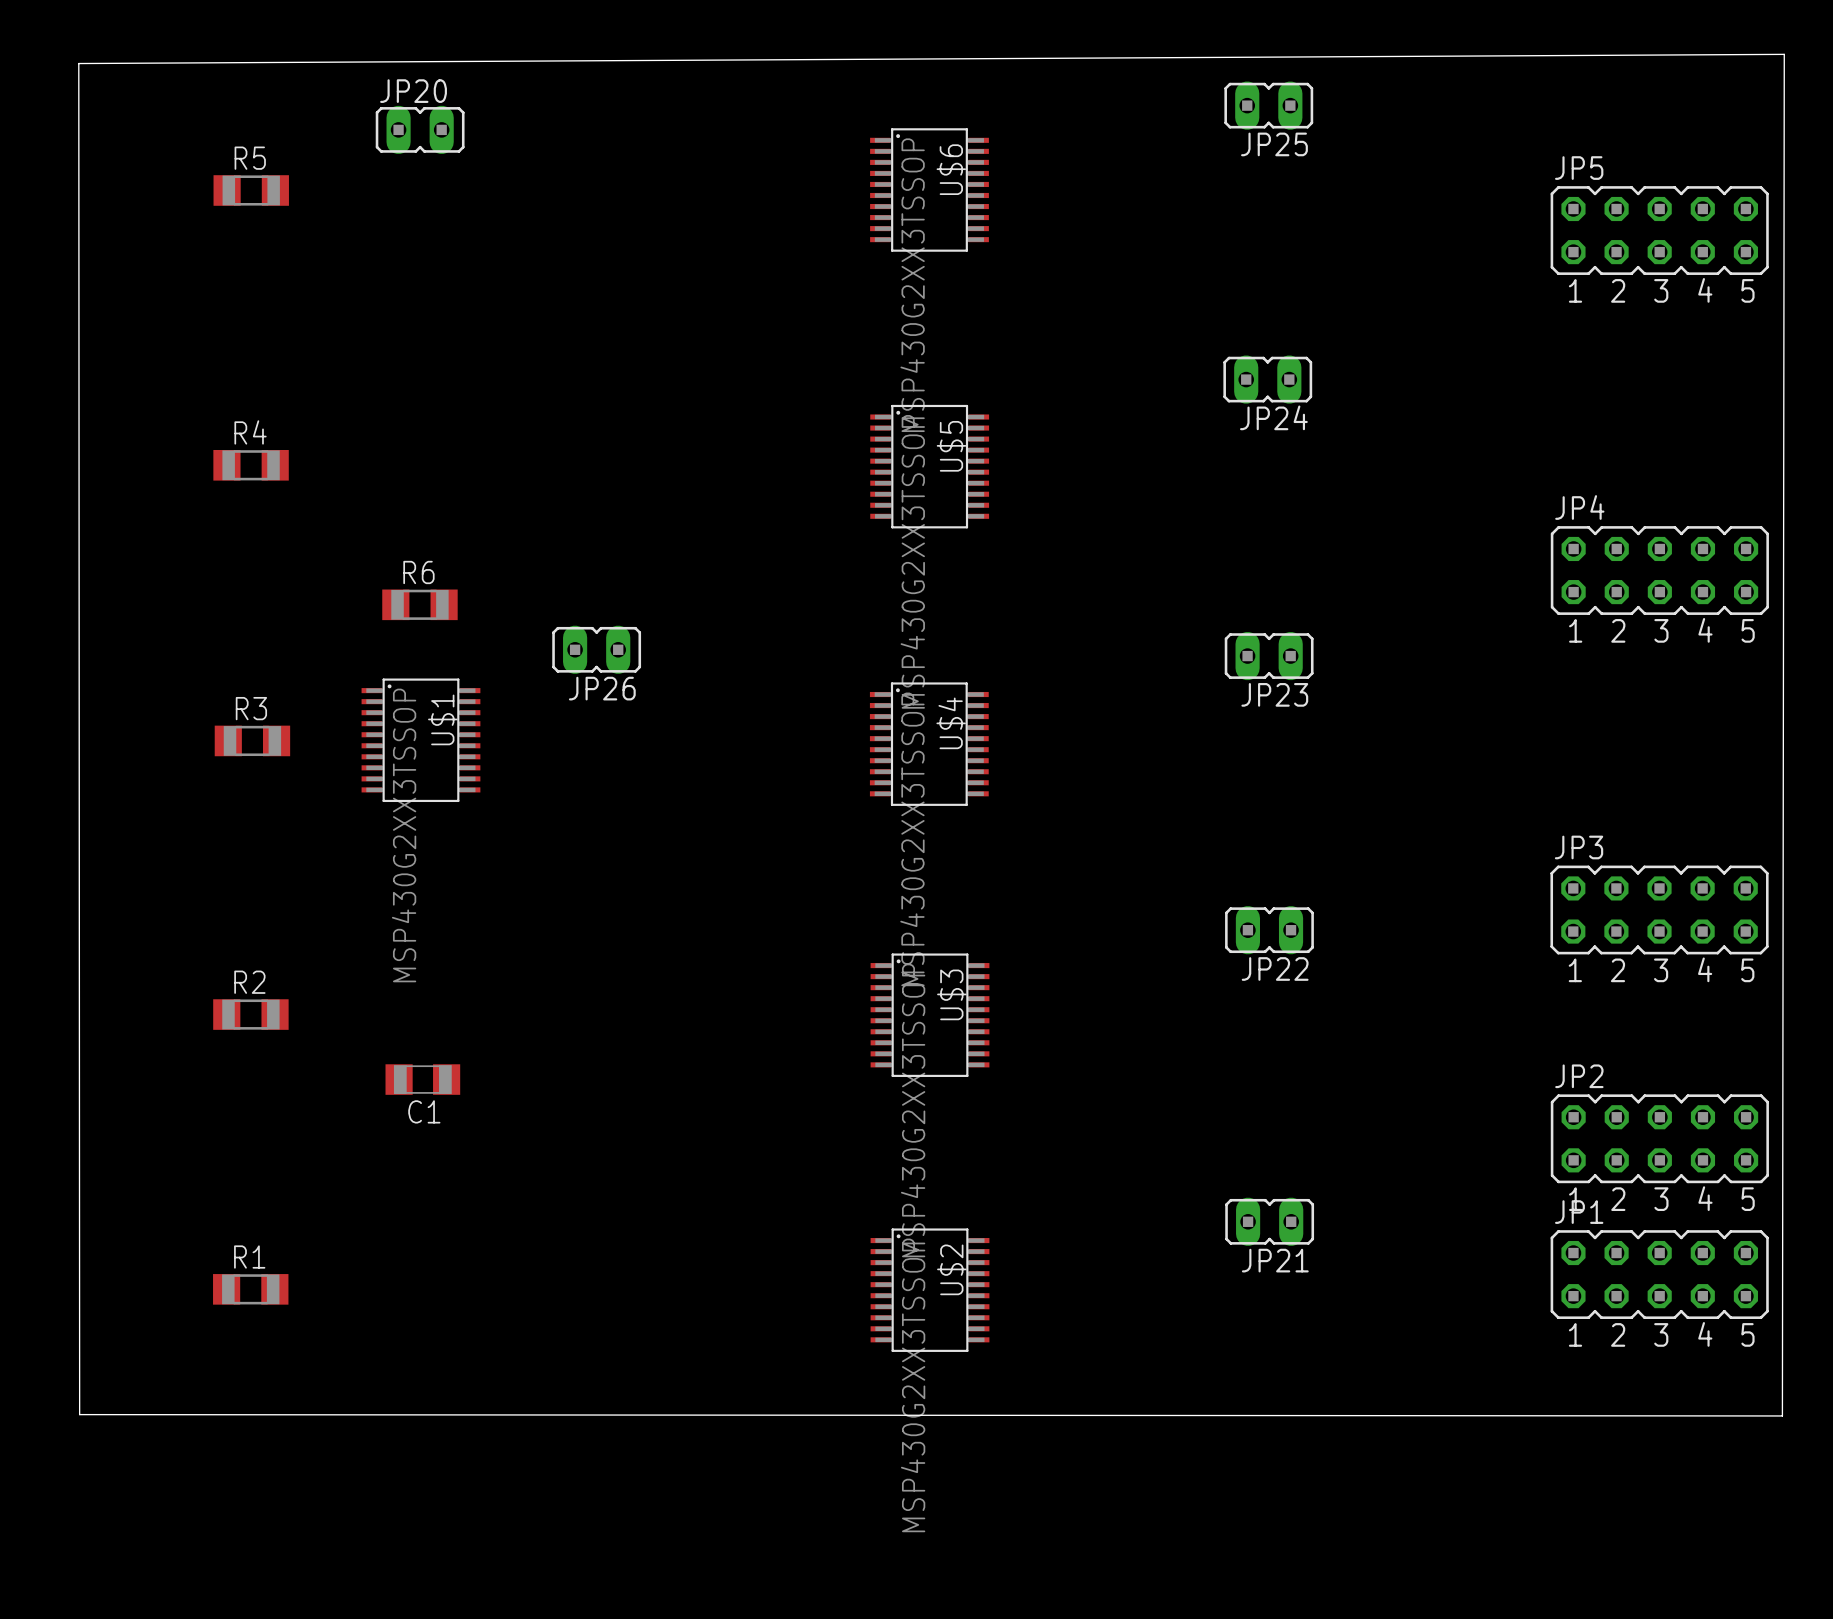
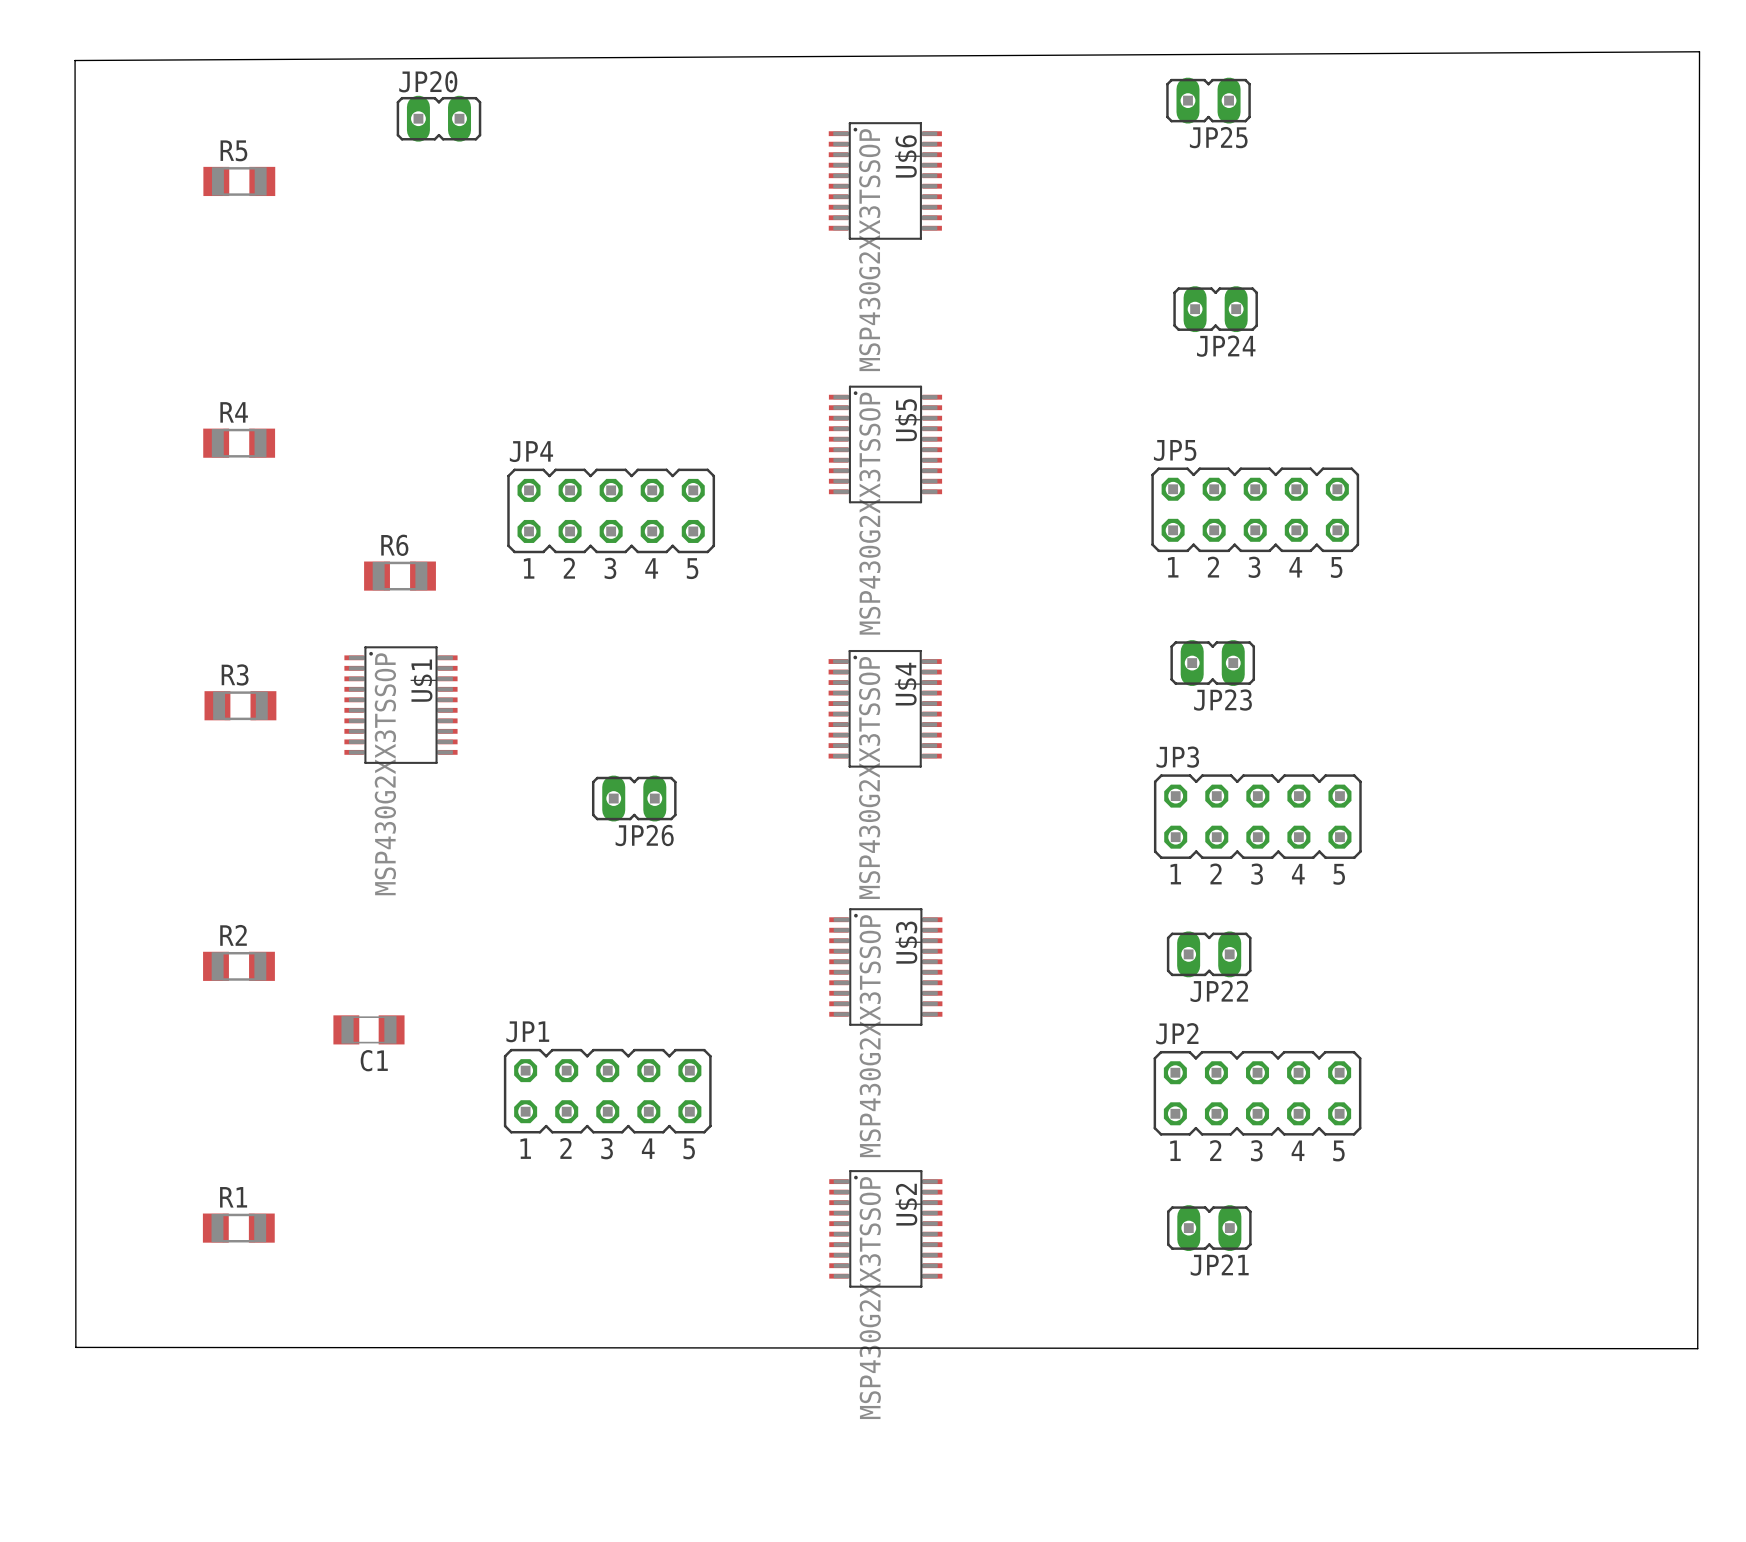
JP20 position: (420, 129) -> (438, 118)
JP5 position: (1659, 230) -> (1255, 509)
JP24 position: (1267, 379) -> (1215, 309)
JP4 position: (1659, 570) -> (611, 510)
JP26 position: (596, 649) -> (634, 798)
JP23 position: (1269, 656) -> (1212, 663)
JP3 position: (1659, 909) -> (1257, 816)
JP22 position: (1269, 930) -> (1209, 954)
C1 position: (422, 1079) -> (368, 1029)
JP2 position: (1659, 1138) -> (1257, 1093)
JP21 position: (1269, 1221) -> (1209, 1228)
JP1 position: (1659, 1274) -> (607, 1091)

